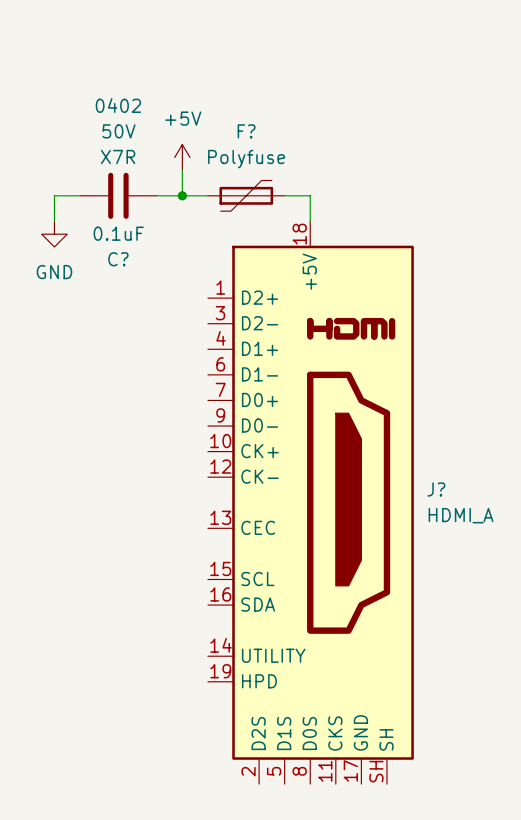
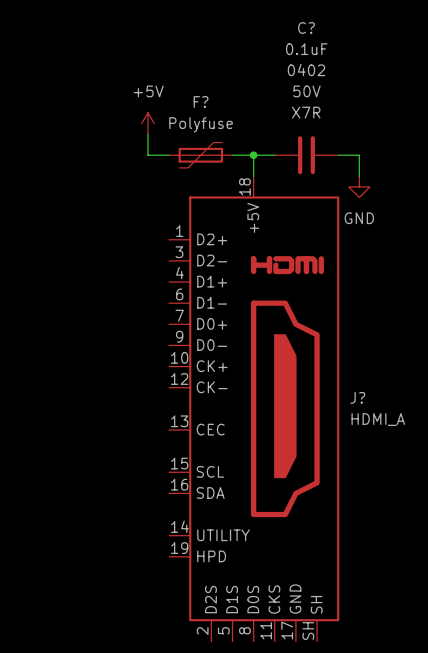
wire: (80, 195) (54, 195) (54, 221) -> none
C?: 0.1uF (118, 195) -> none
wire: (156, 195) (182, 195) -> (253, 155) (274, 155)
junction: (182, 195) -> none
junction: none -> (253, 155)
C?: none -> 0.1uF (306, 155)
wire: none -> (338, 155) (359, 155) (359, 176)
power symbol: GND (54, 234) -> none
power symbol: none -> GND (359, 186)

